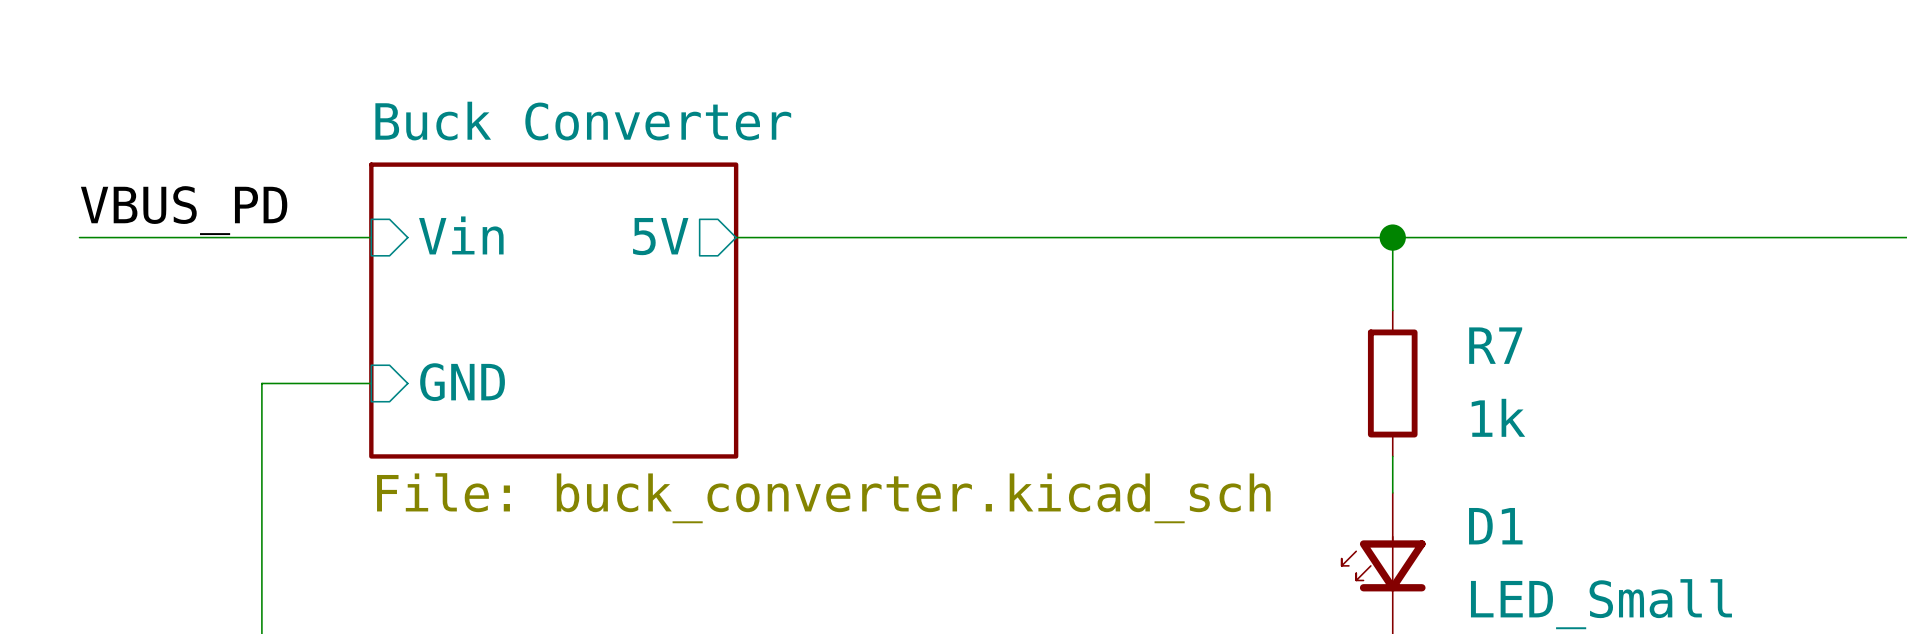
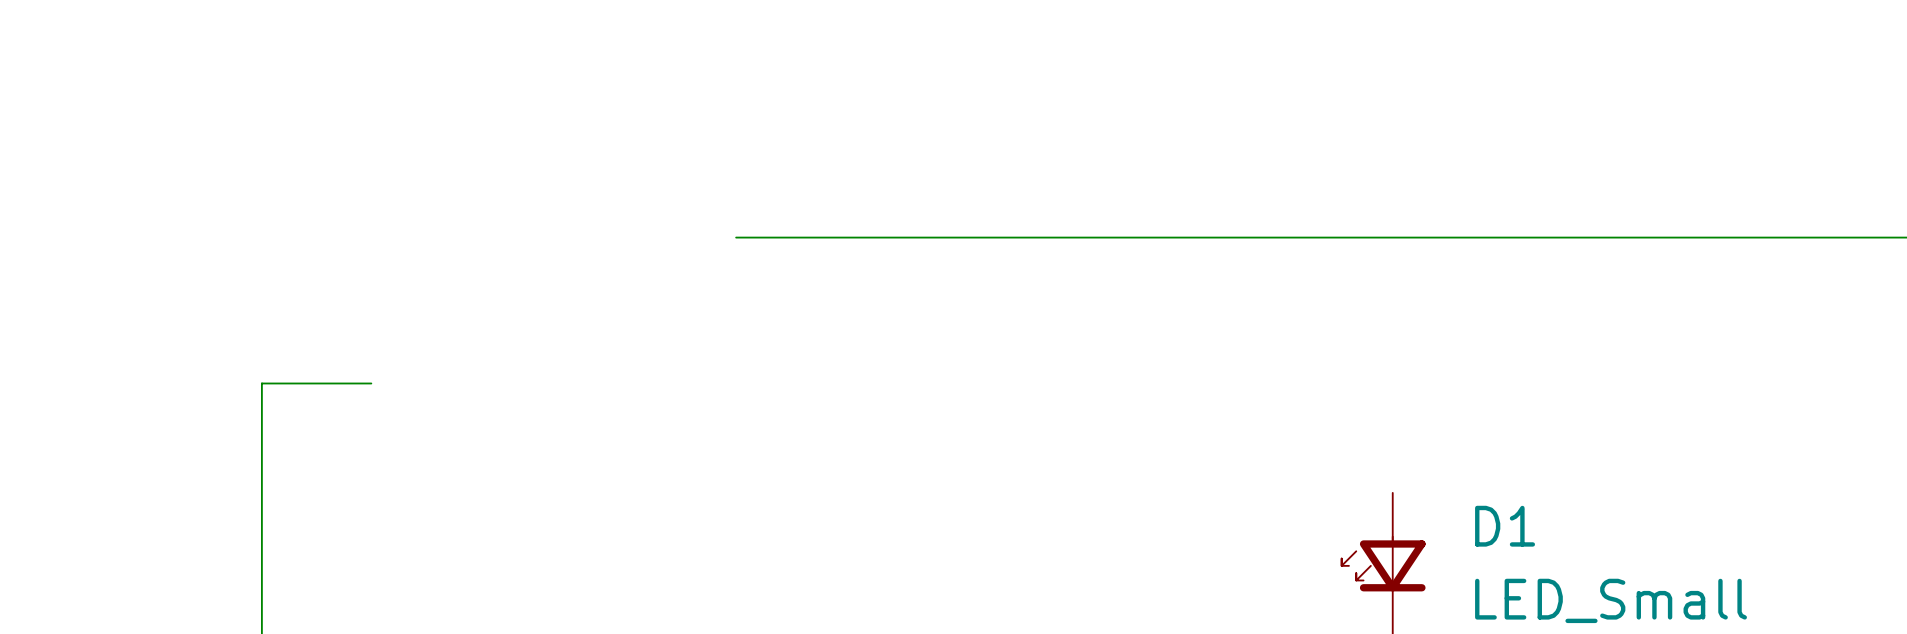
label: VBUS_PD (184, 210) -> none
sheet pin: Vin (461, 235) -> none
sheet pin: 5V (660, 236) -> none
wire: (79, 237) (371, 237) -> none
wire: (1392, 237) (1392, 310) -> none
junction: (1392, 237) -> none
sheet Buck Converter: File: buck_converter.kicad_sch (553, 310) -> none
sheet pin: GND (462, 382) -> none
R7: 1k (1392, 383) -> none
wire: (1392, 456) (1392, 492) -> none

